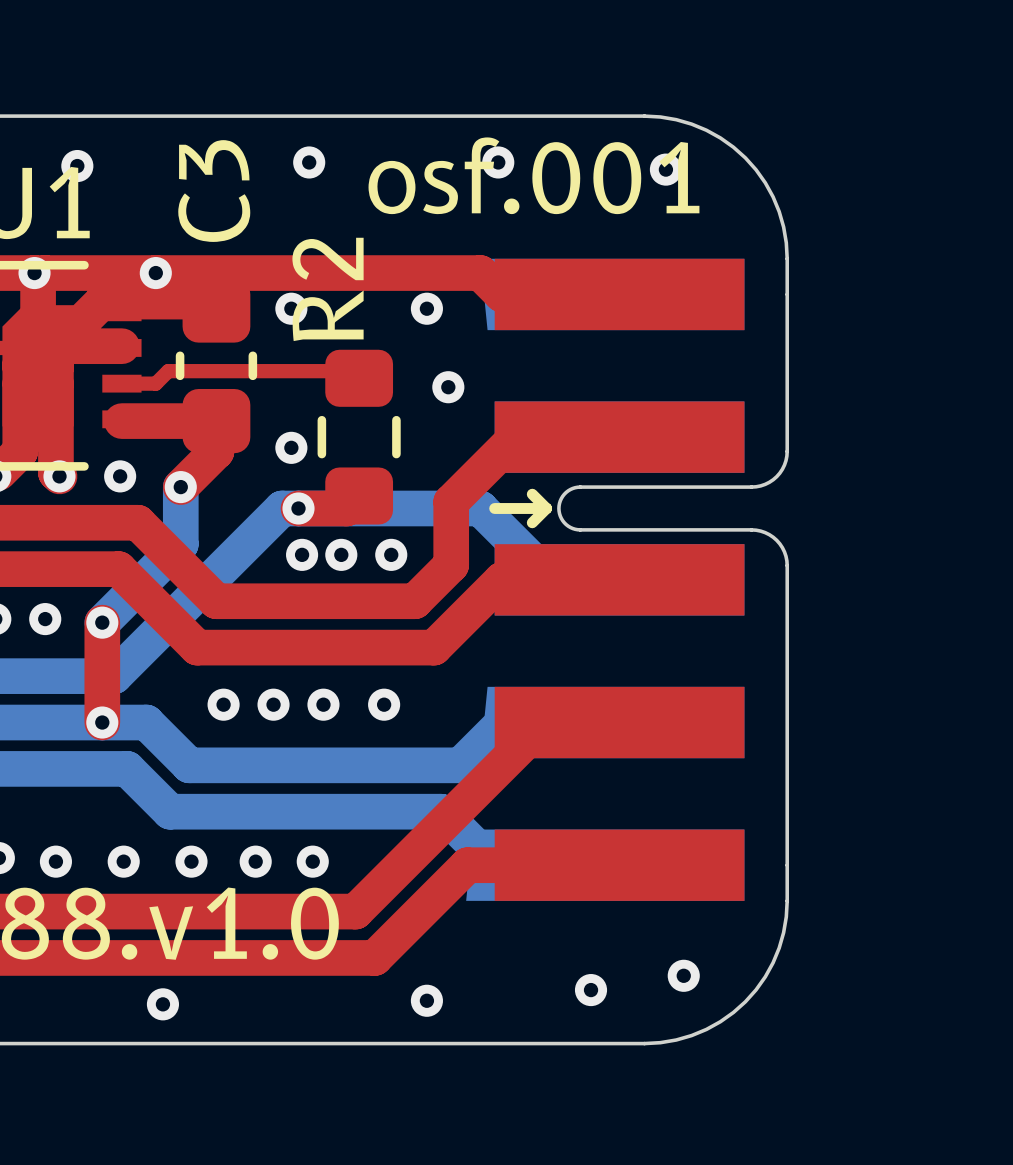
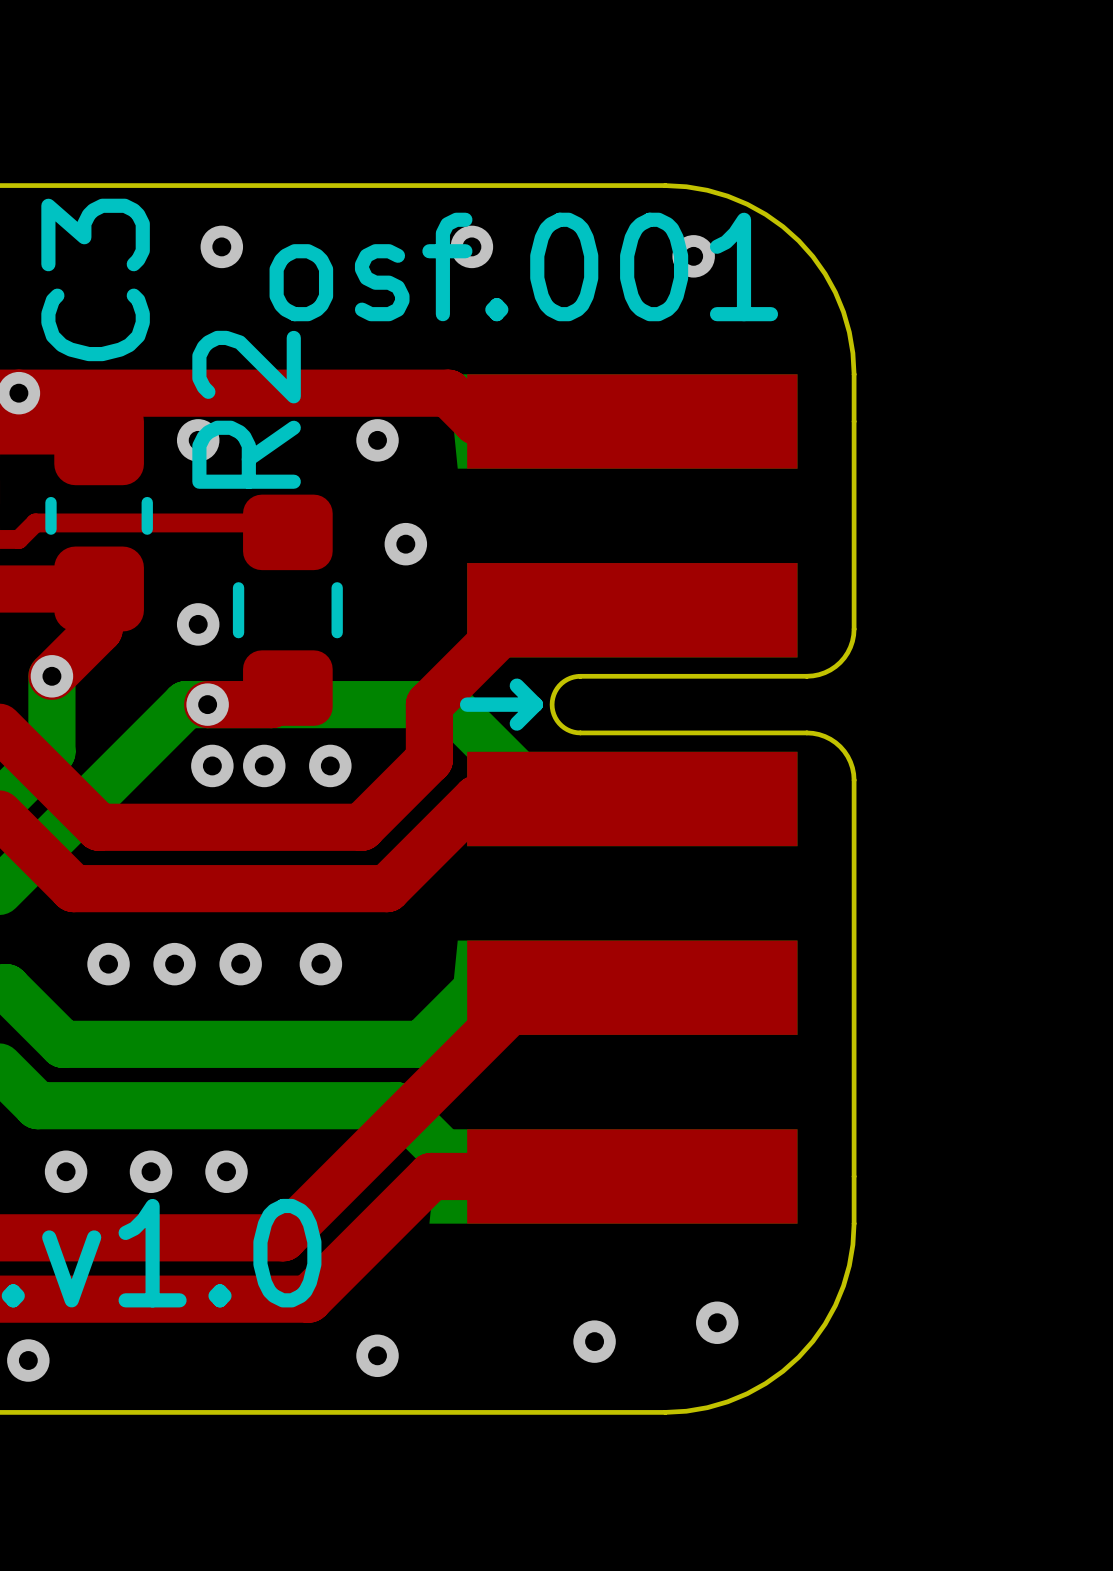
top track: (537, 437) (516, 437) (451, 502) (451, 564) -> (523, 610) (429, 704) (429, 759) (409, 779)

